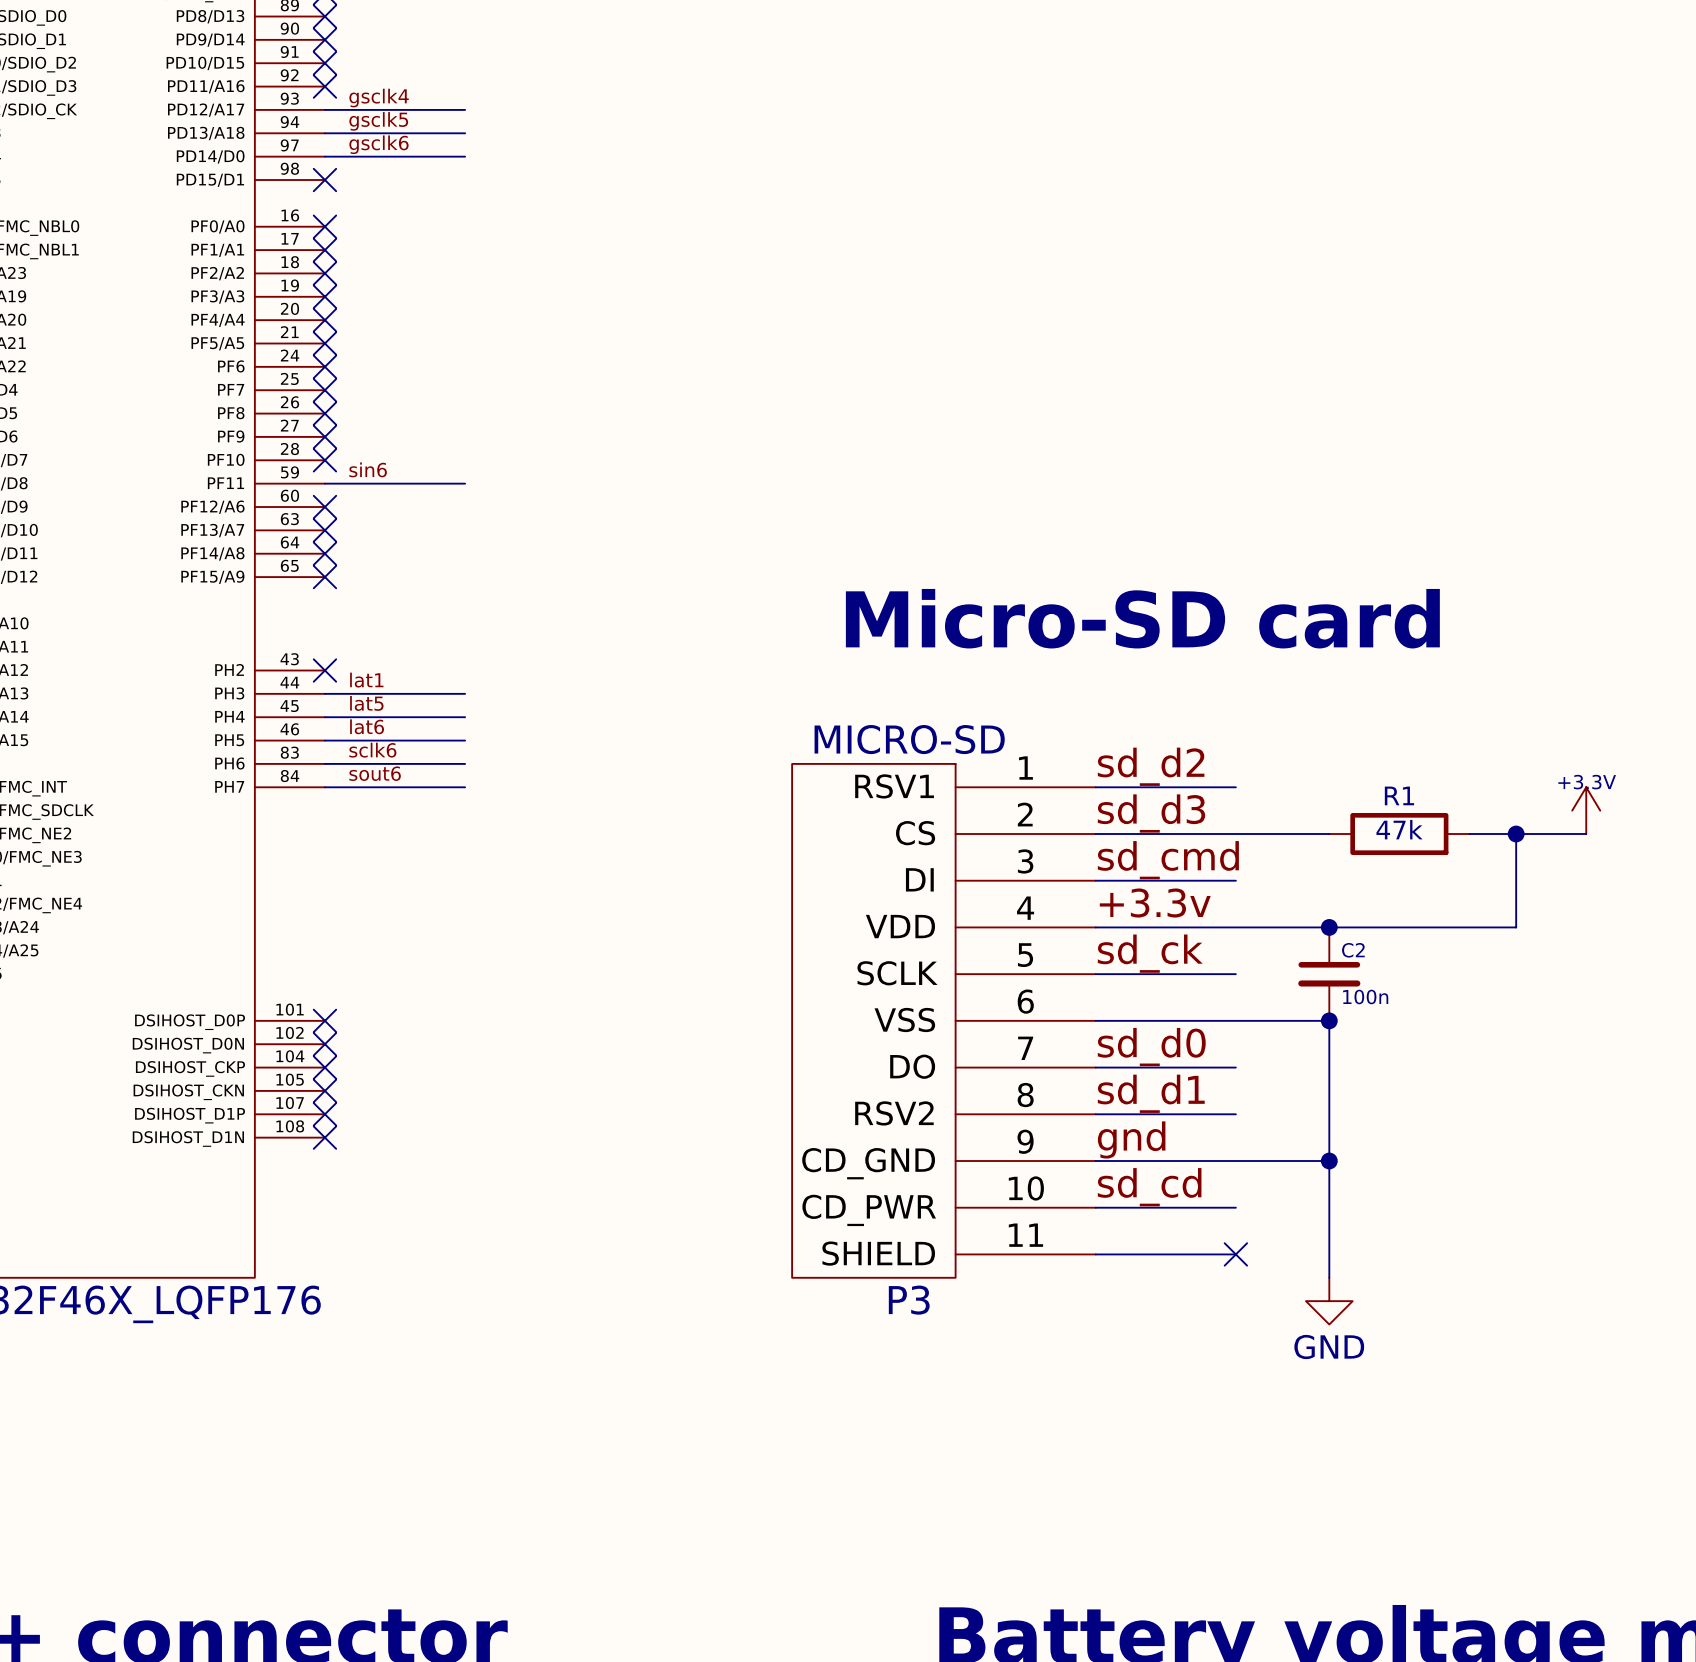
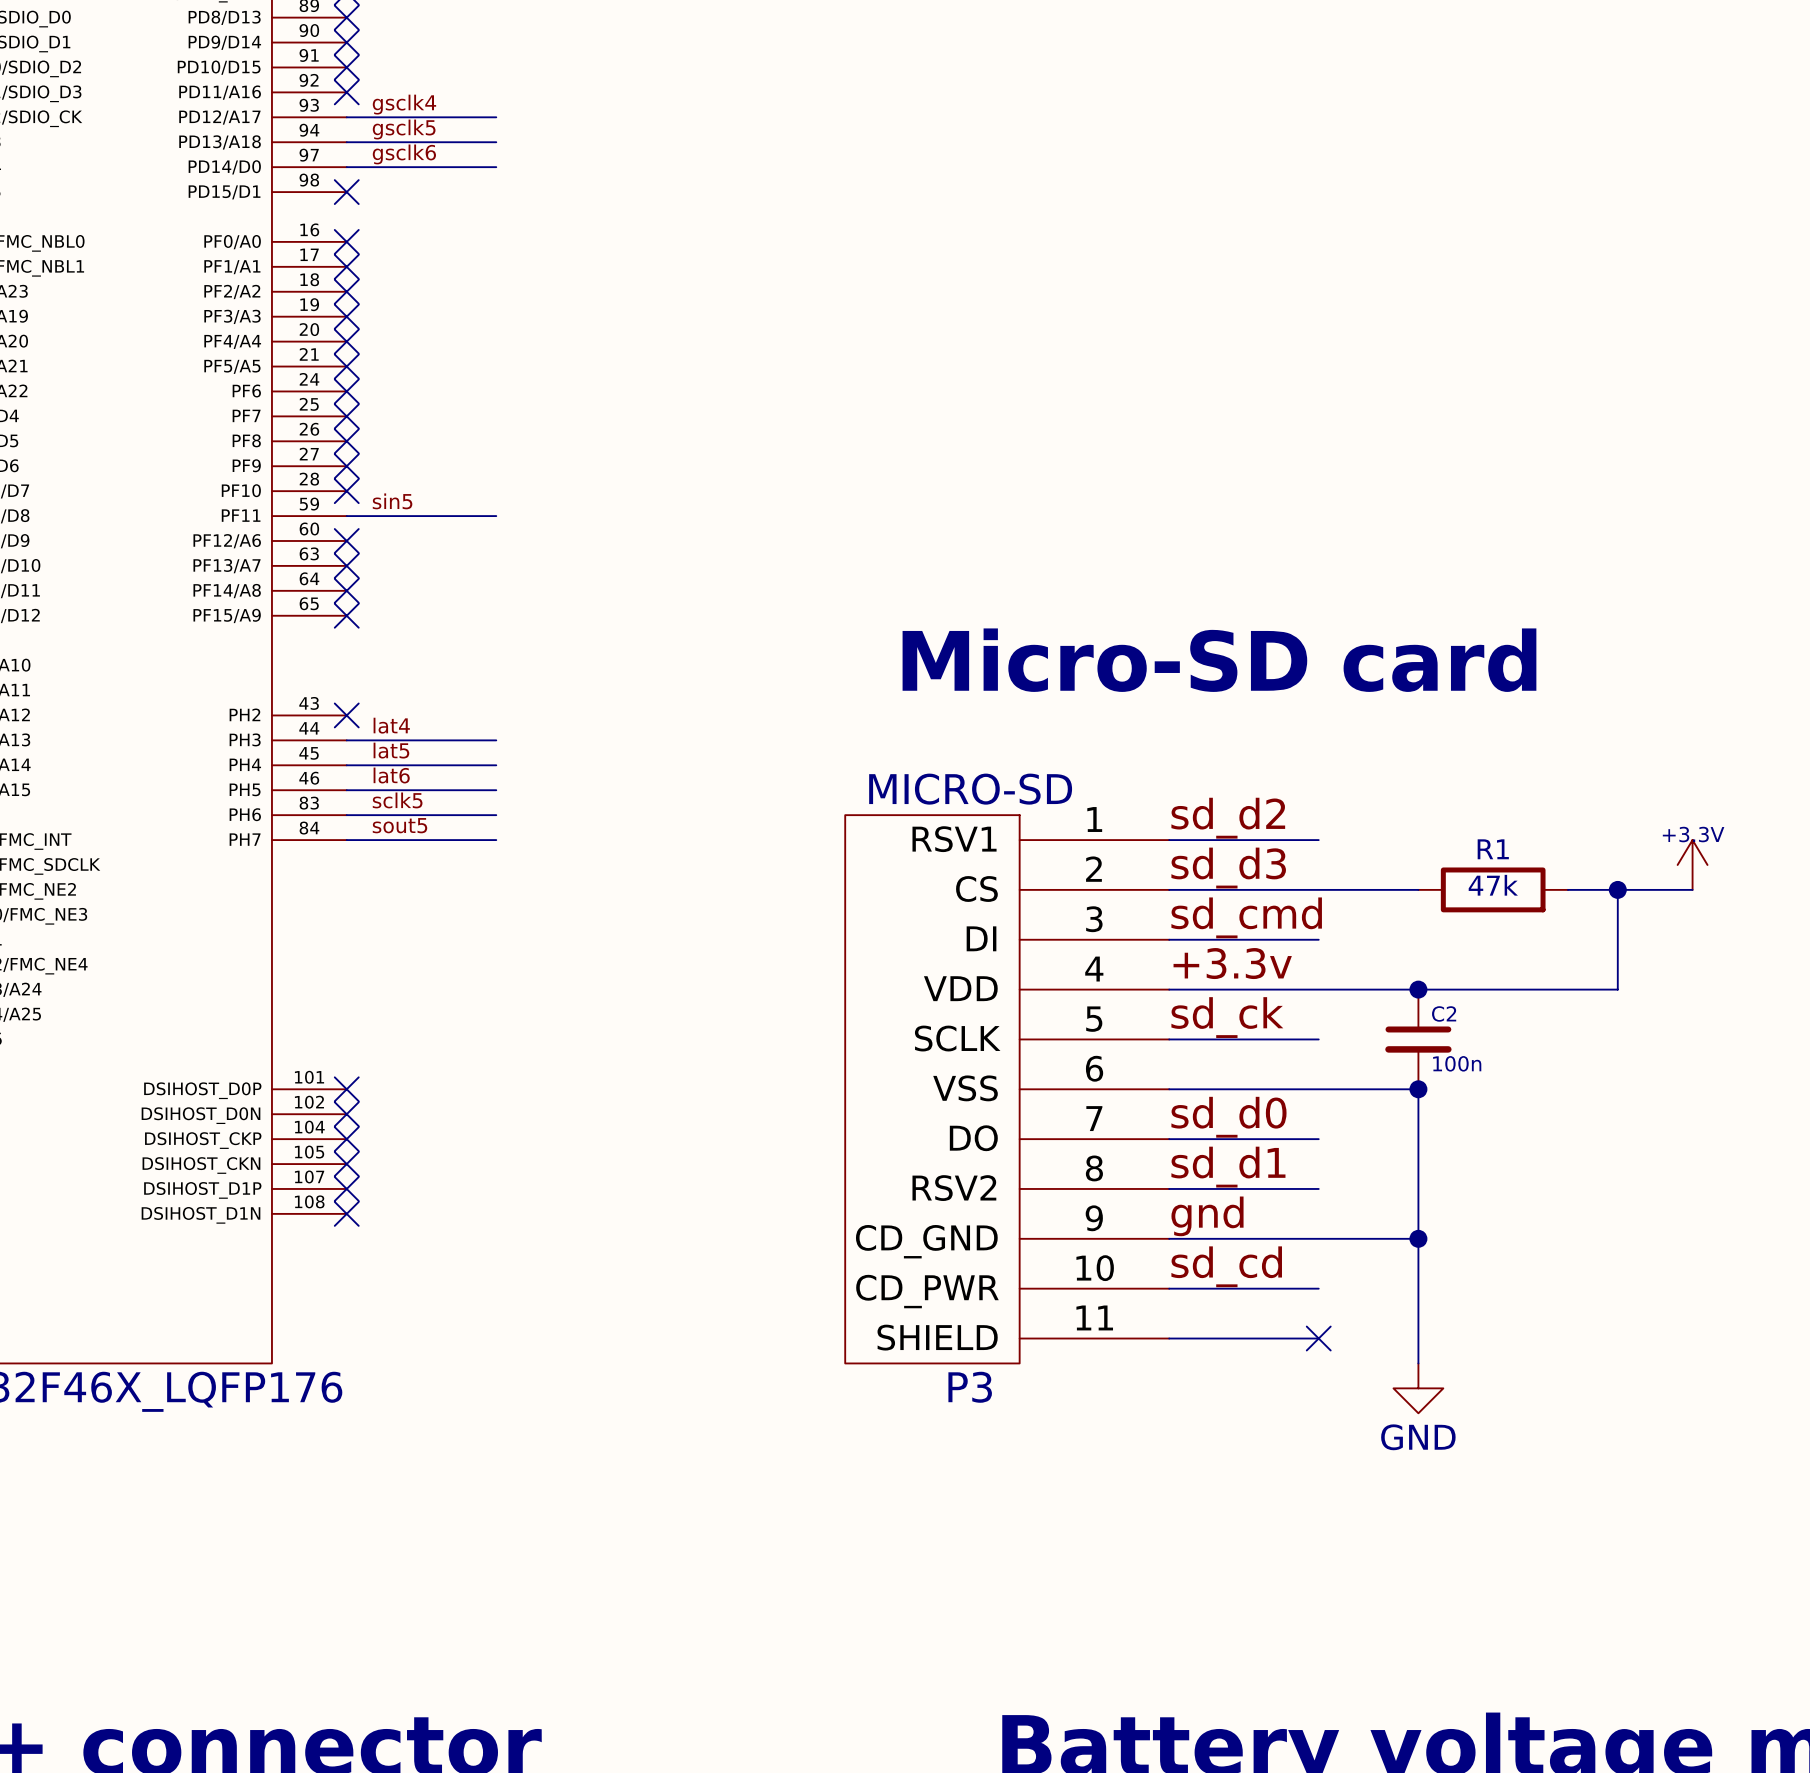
label: sin6 (368, 469) -> sin5 (392, 501)
label: lat1 (366, 680) -> lat4 (391, 725)
label: sclk6 (372, 750) -> sclk5 (397, 800)
label: sout6 (375, 773) -> sout5 (399, 825)

